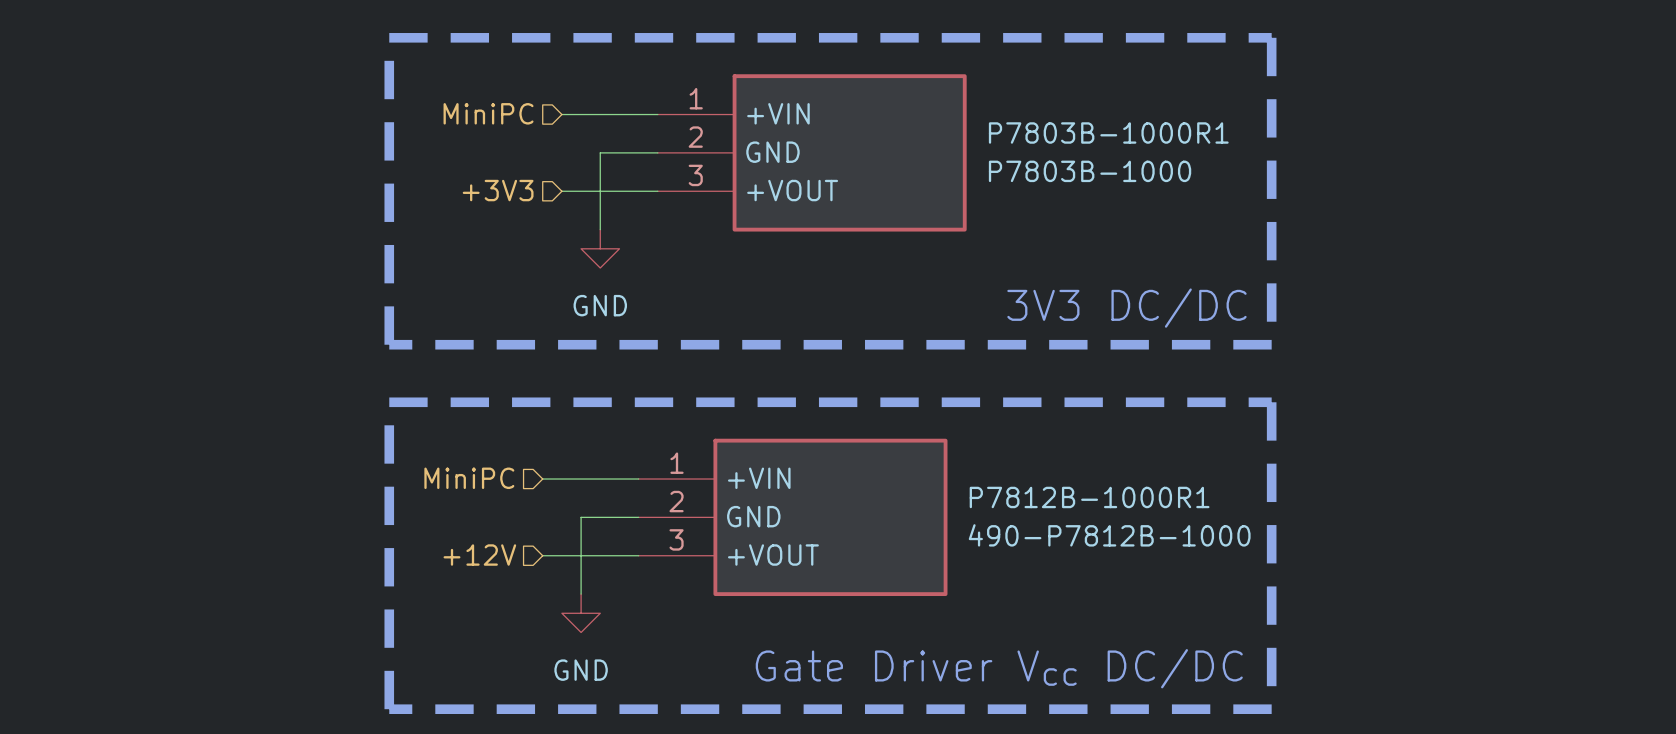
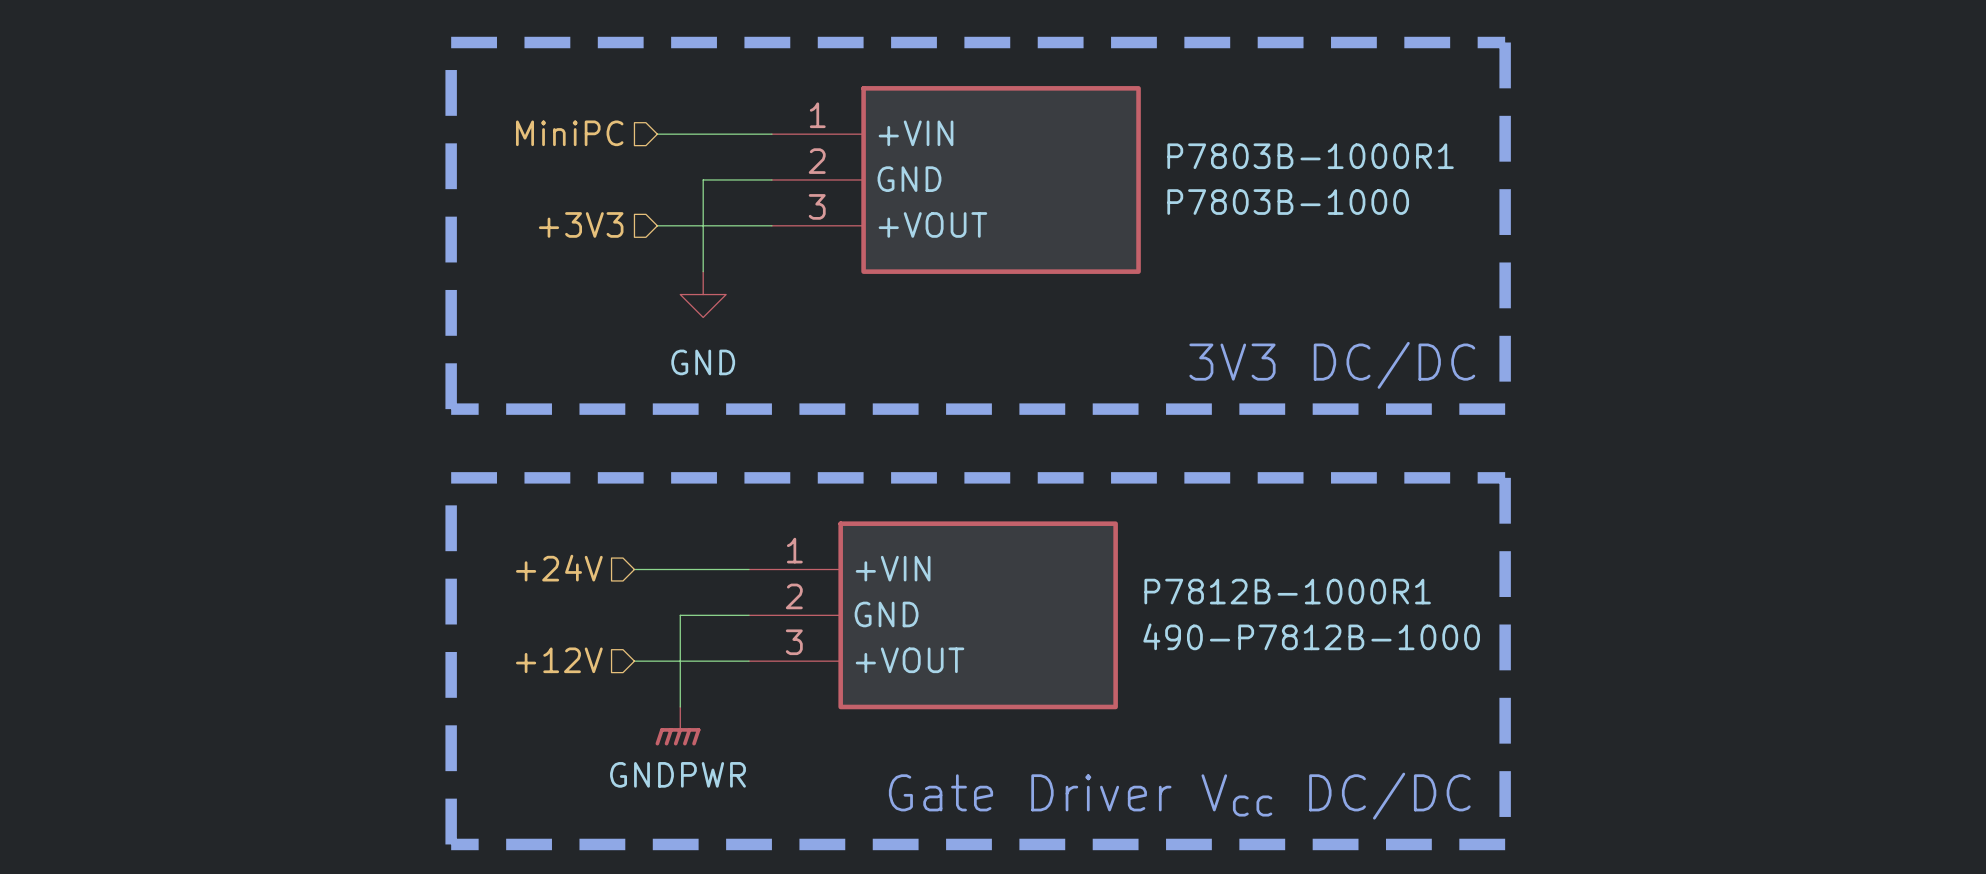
hierarchical label: MiniPC (469, 478) -> +24V (559, 568)
power symbol: GND (581, 613) -> GNDPWR (677, 726)

